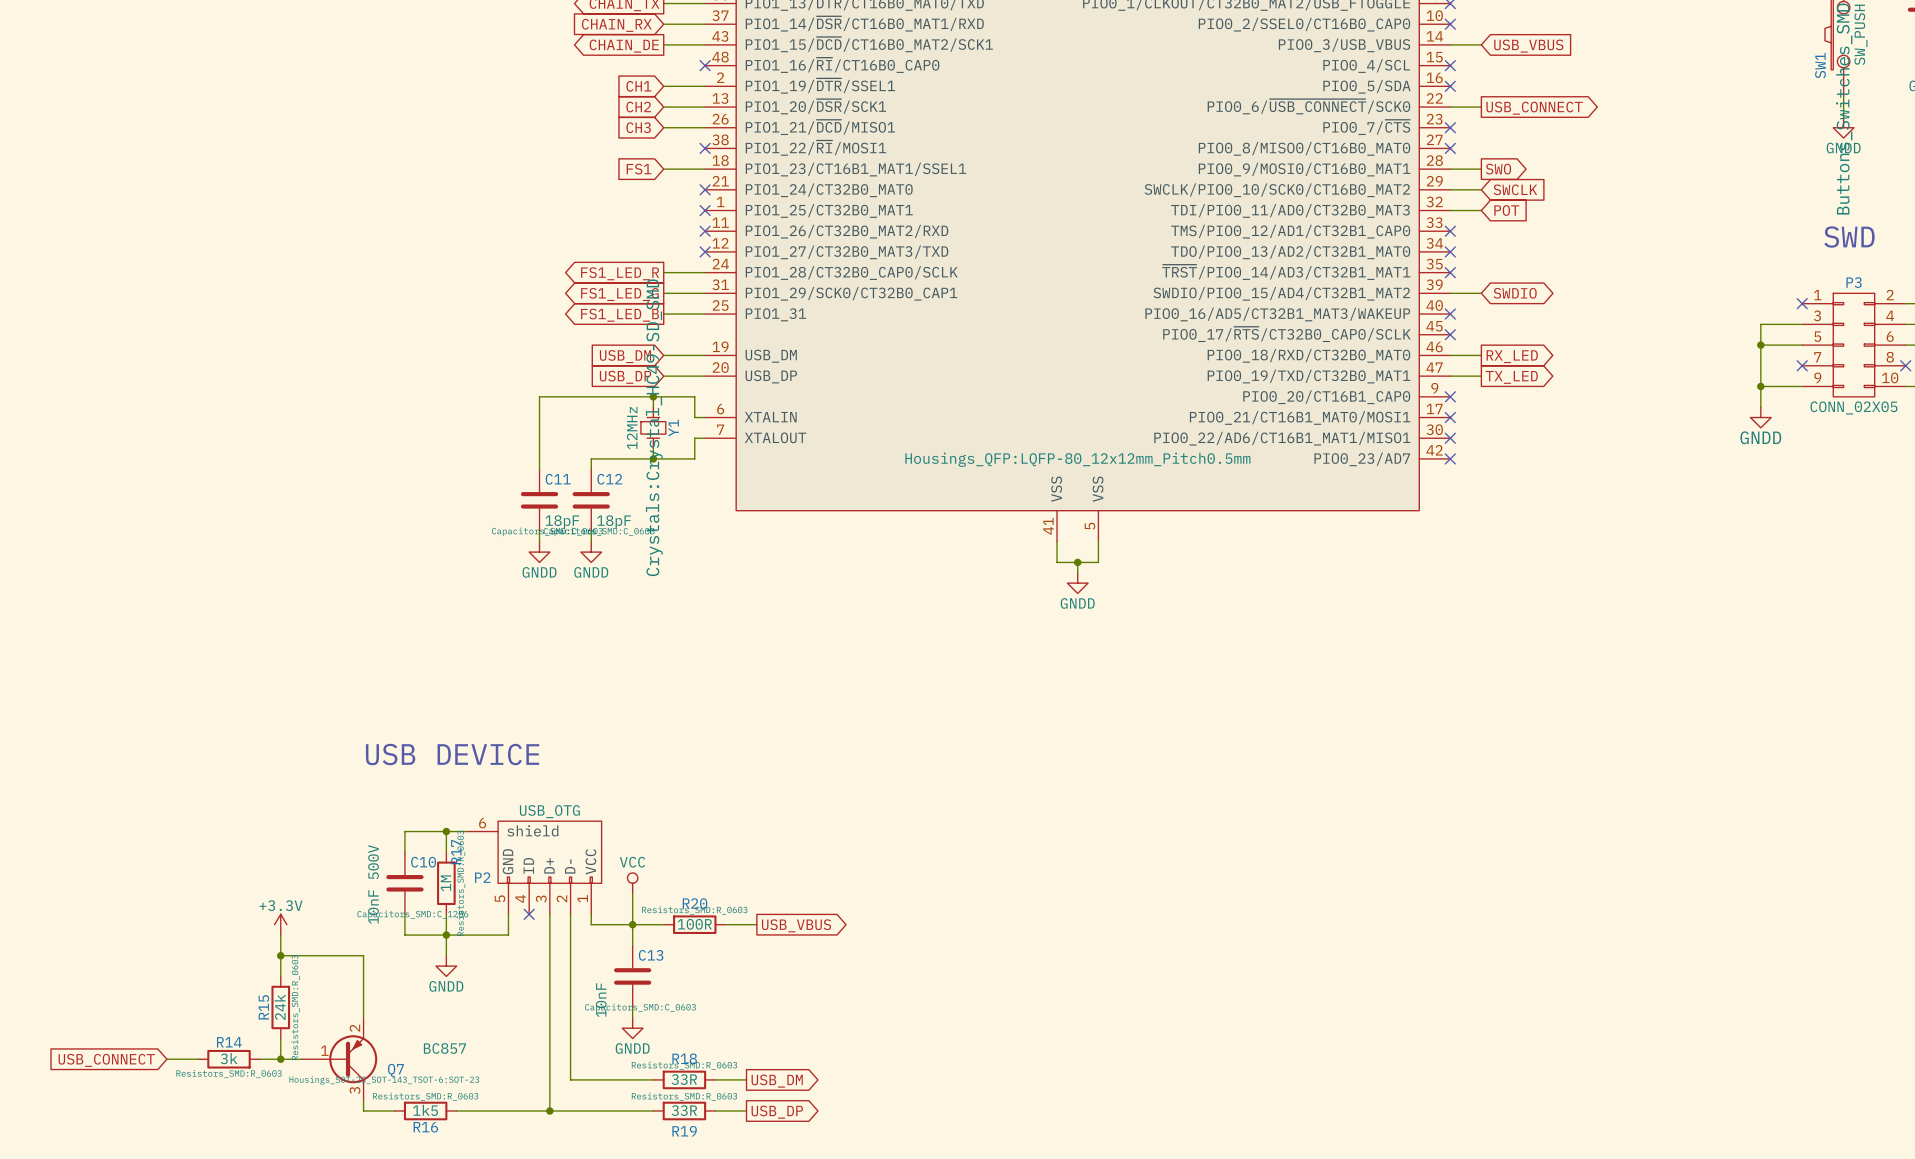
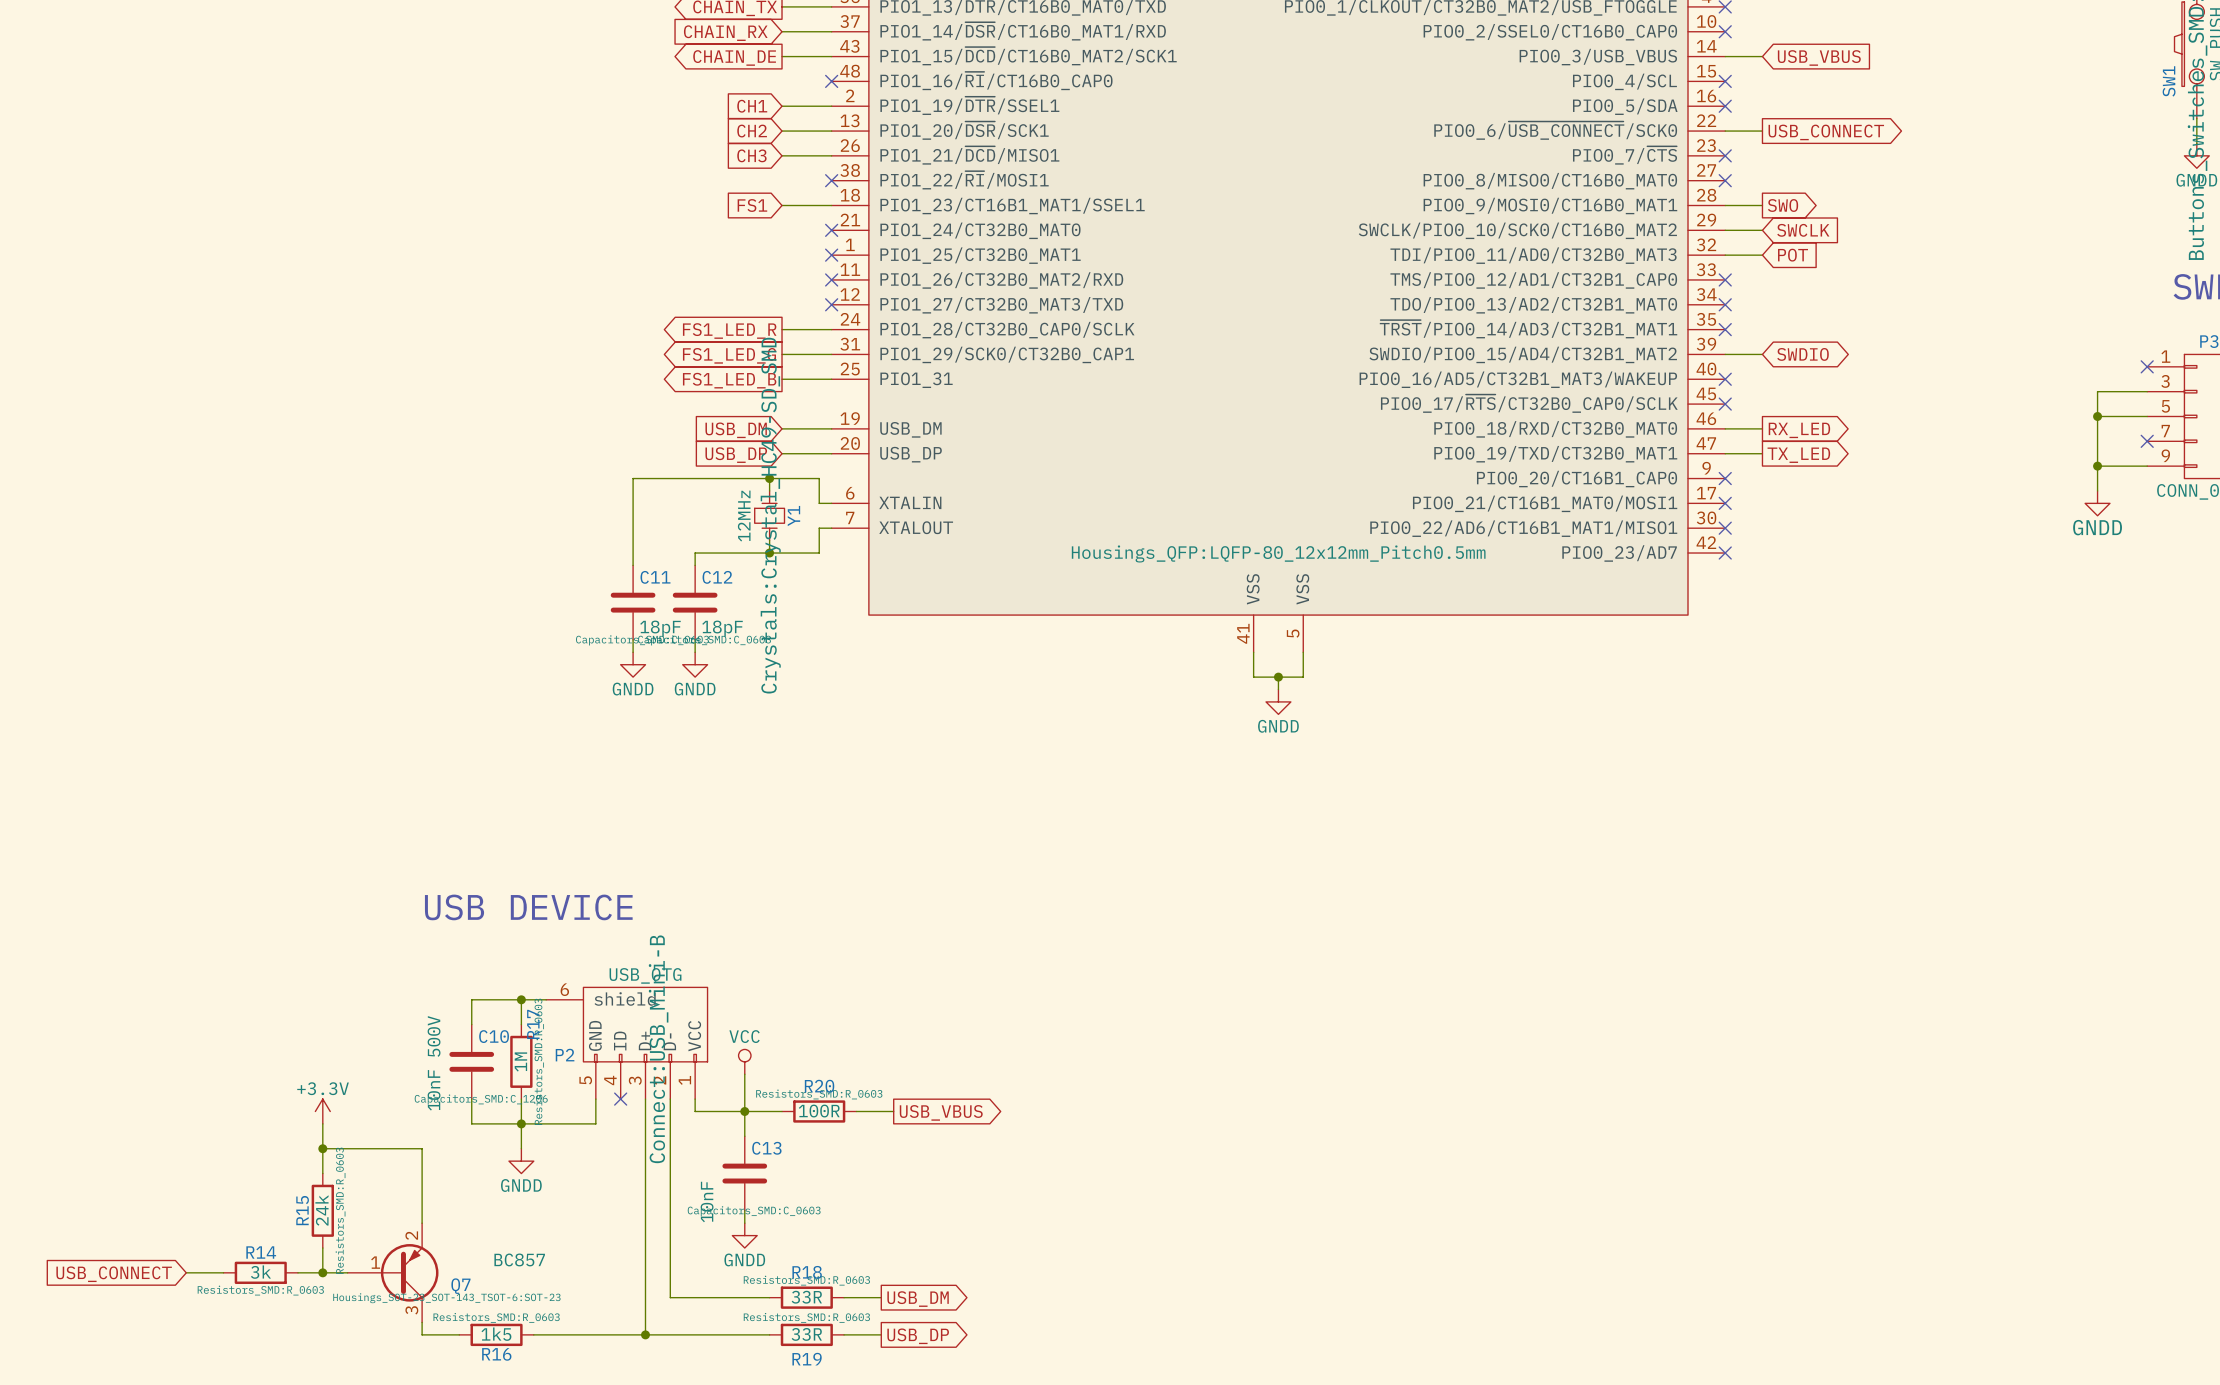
P2 text: none -> Connect:USB_Mini-B (658, 1049)

